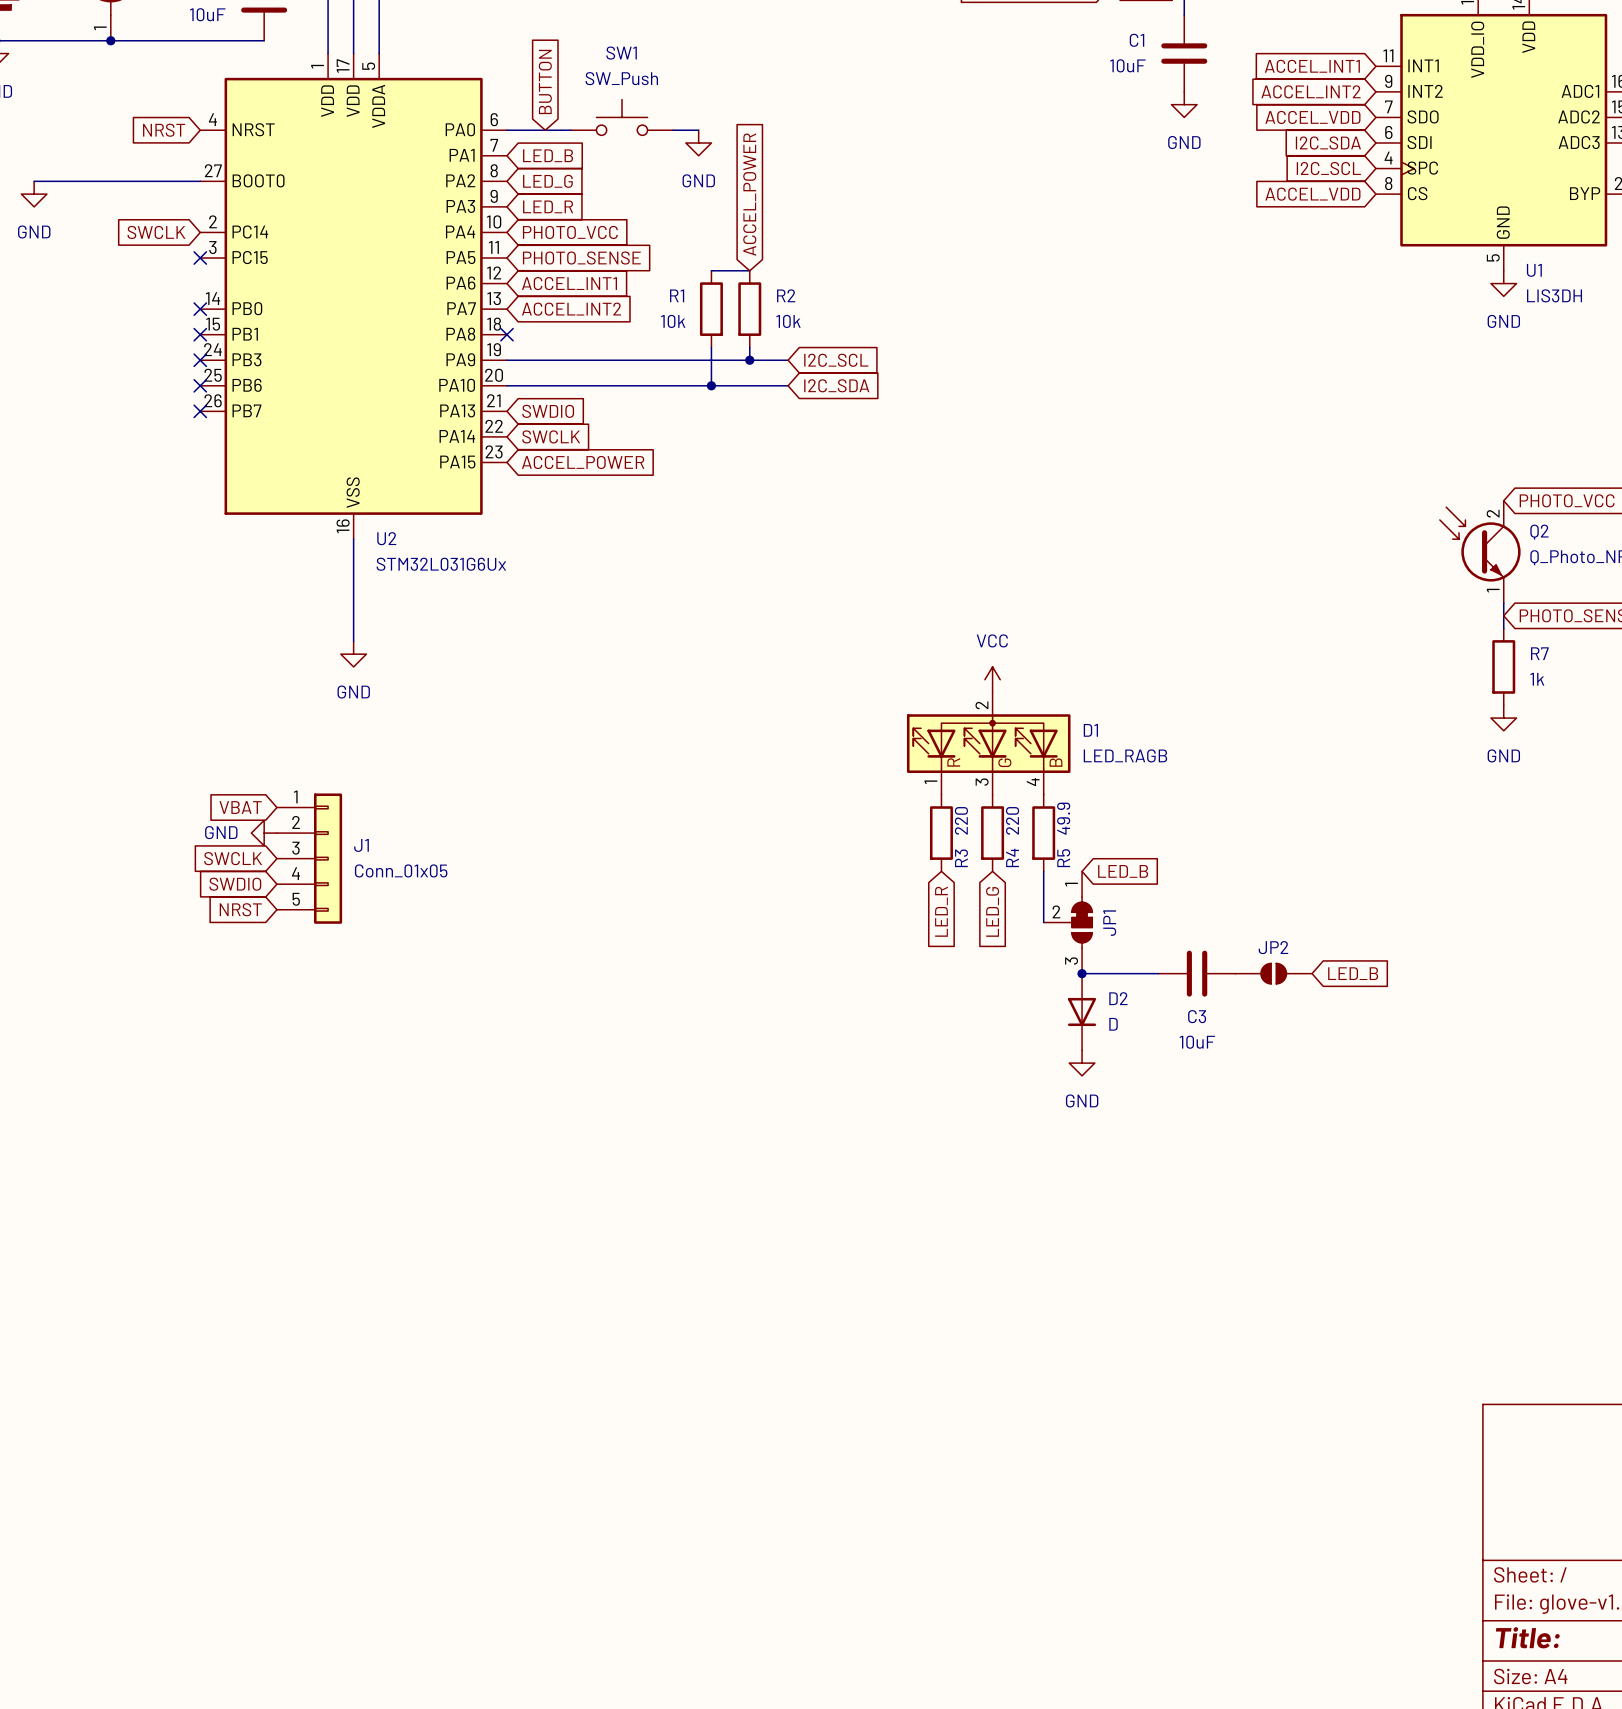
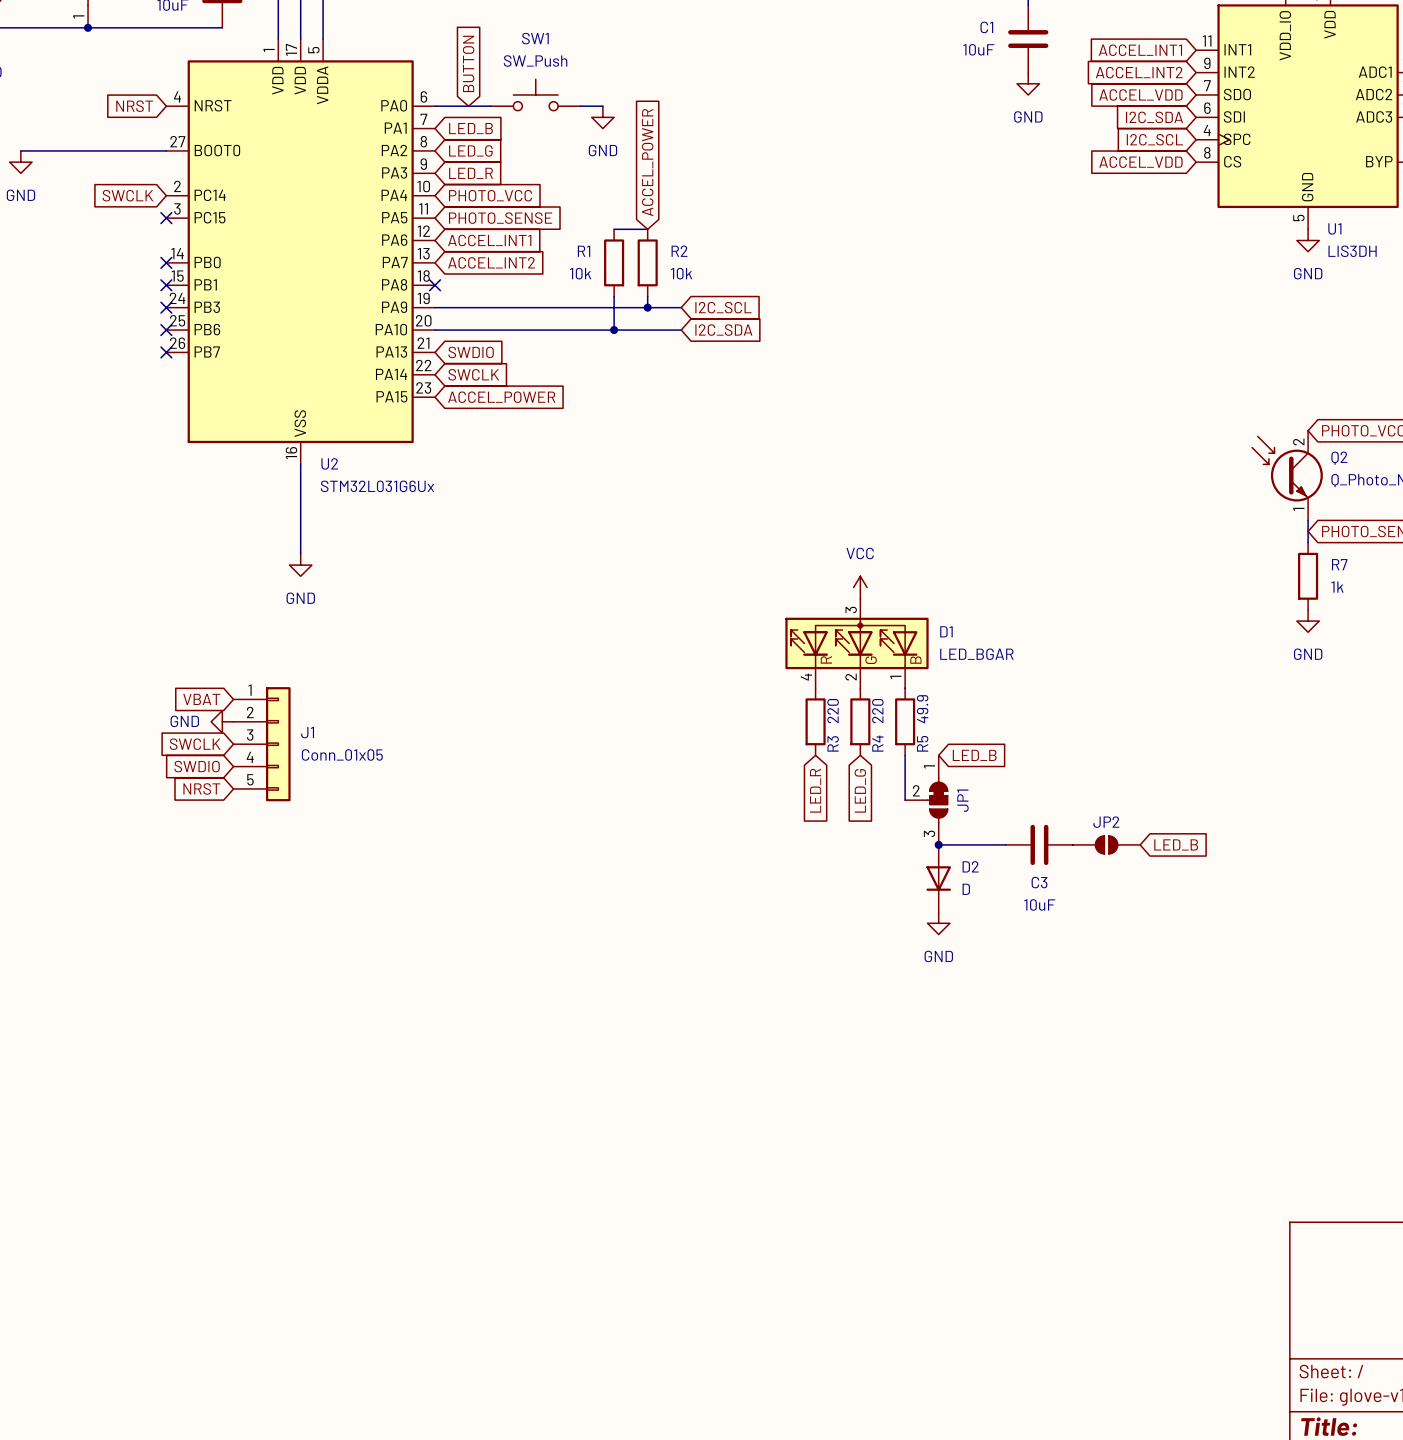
D1 pin number: 2 (981, 705) -> 3 (851, 610)
D1 value: LED_RAGB (1125, 755) -> LED_BGAR (976, 654)
D1 pin number: 1 (930, 782) -> 4 (806, 677)
D1 pin number: 3 (982, 782) -> 2 (851, 677)
D1 pin number: 4 (1033, 782) -> 1 (895, 677)

